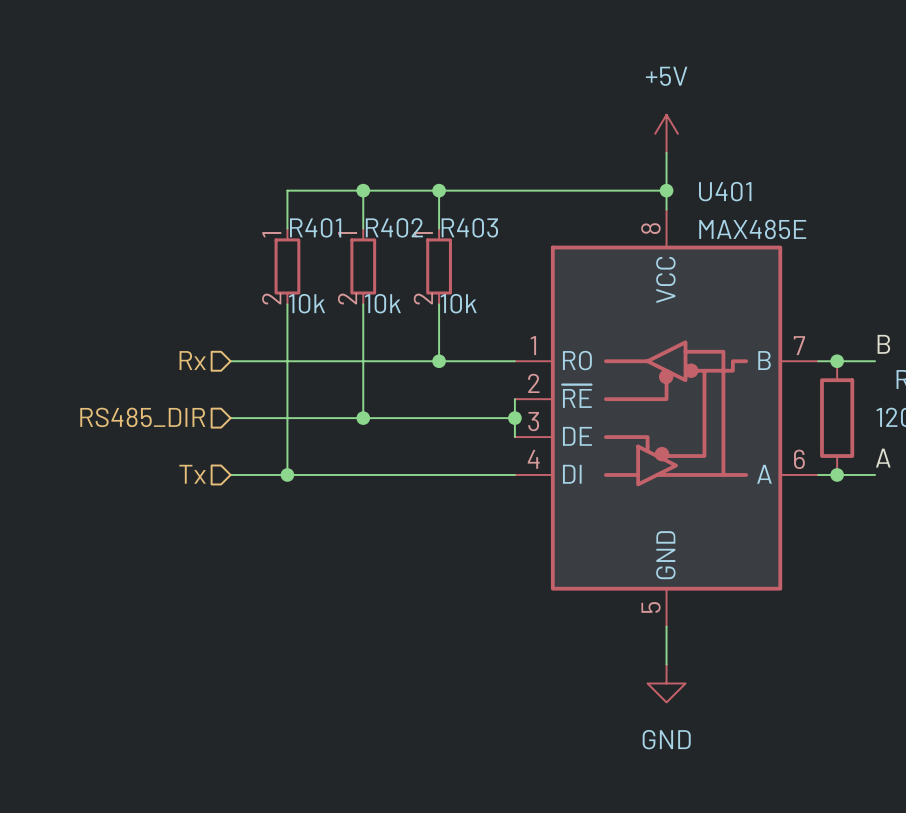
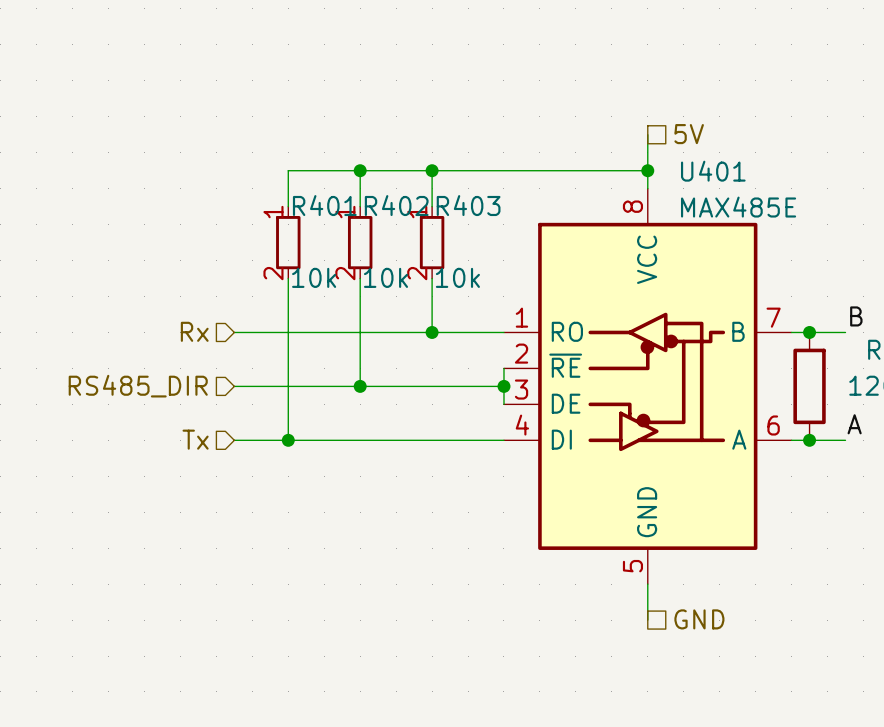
power symbol: +5V (666, 133) -> none
hierarchical label: none -> 5V (689, 134)
hierarchical label: none -> GND (699, 619)
power symbol: GND (666, 683) -> none

